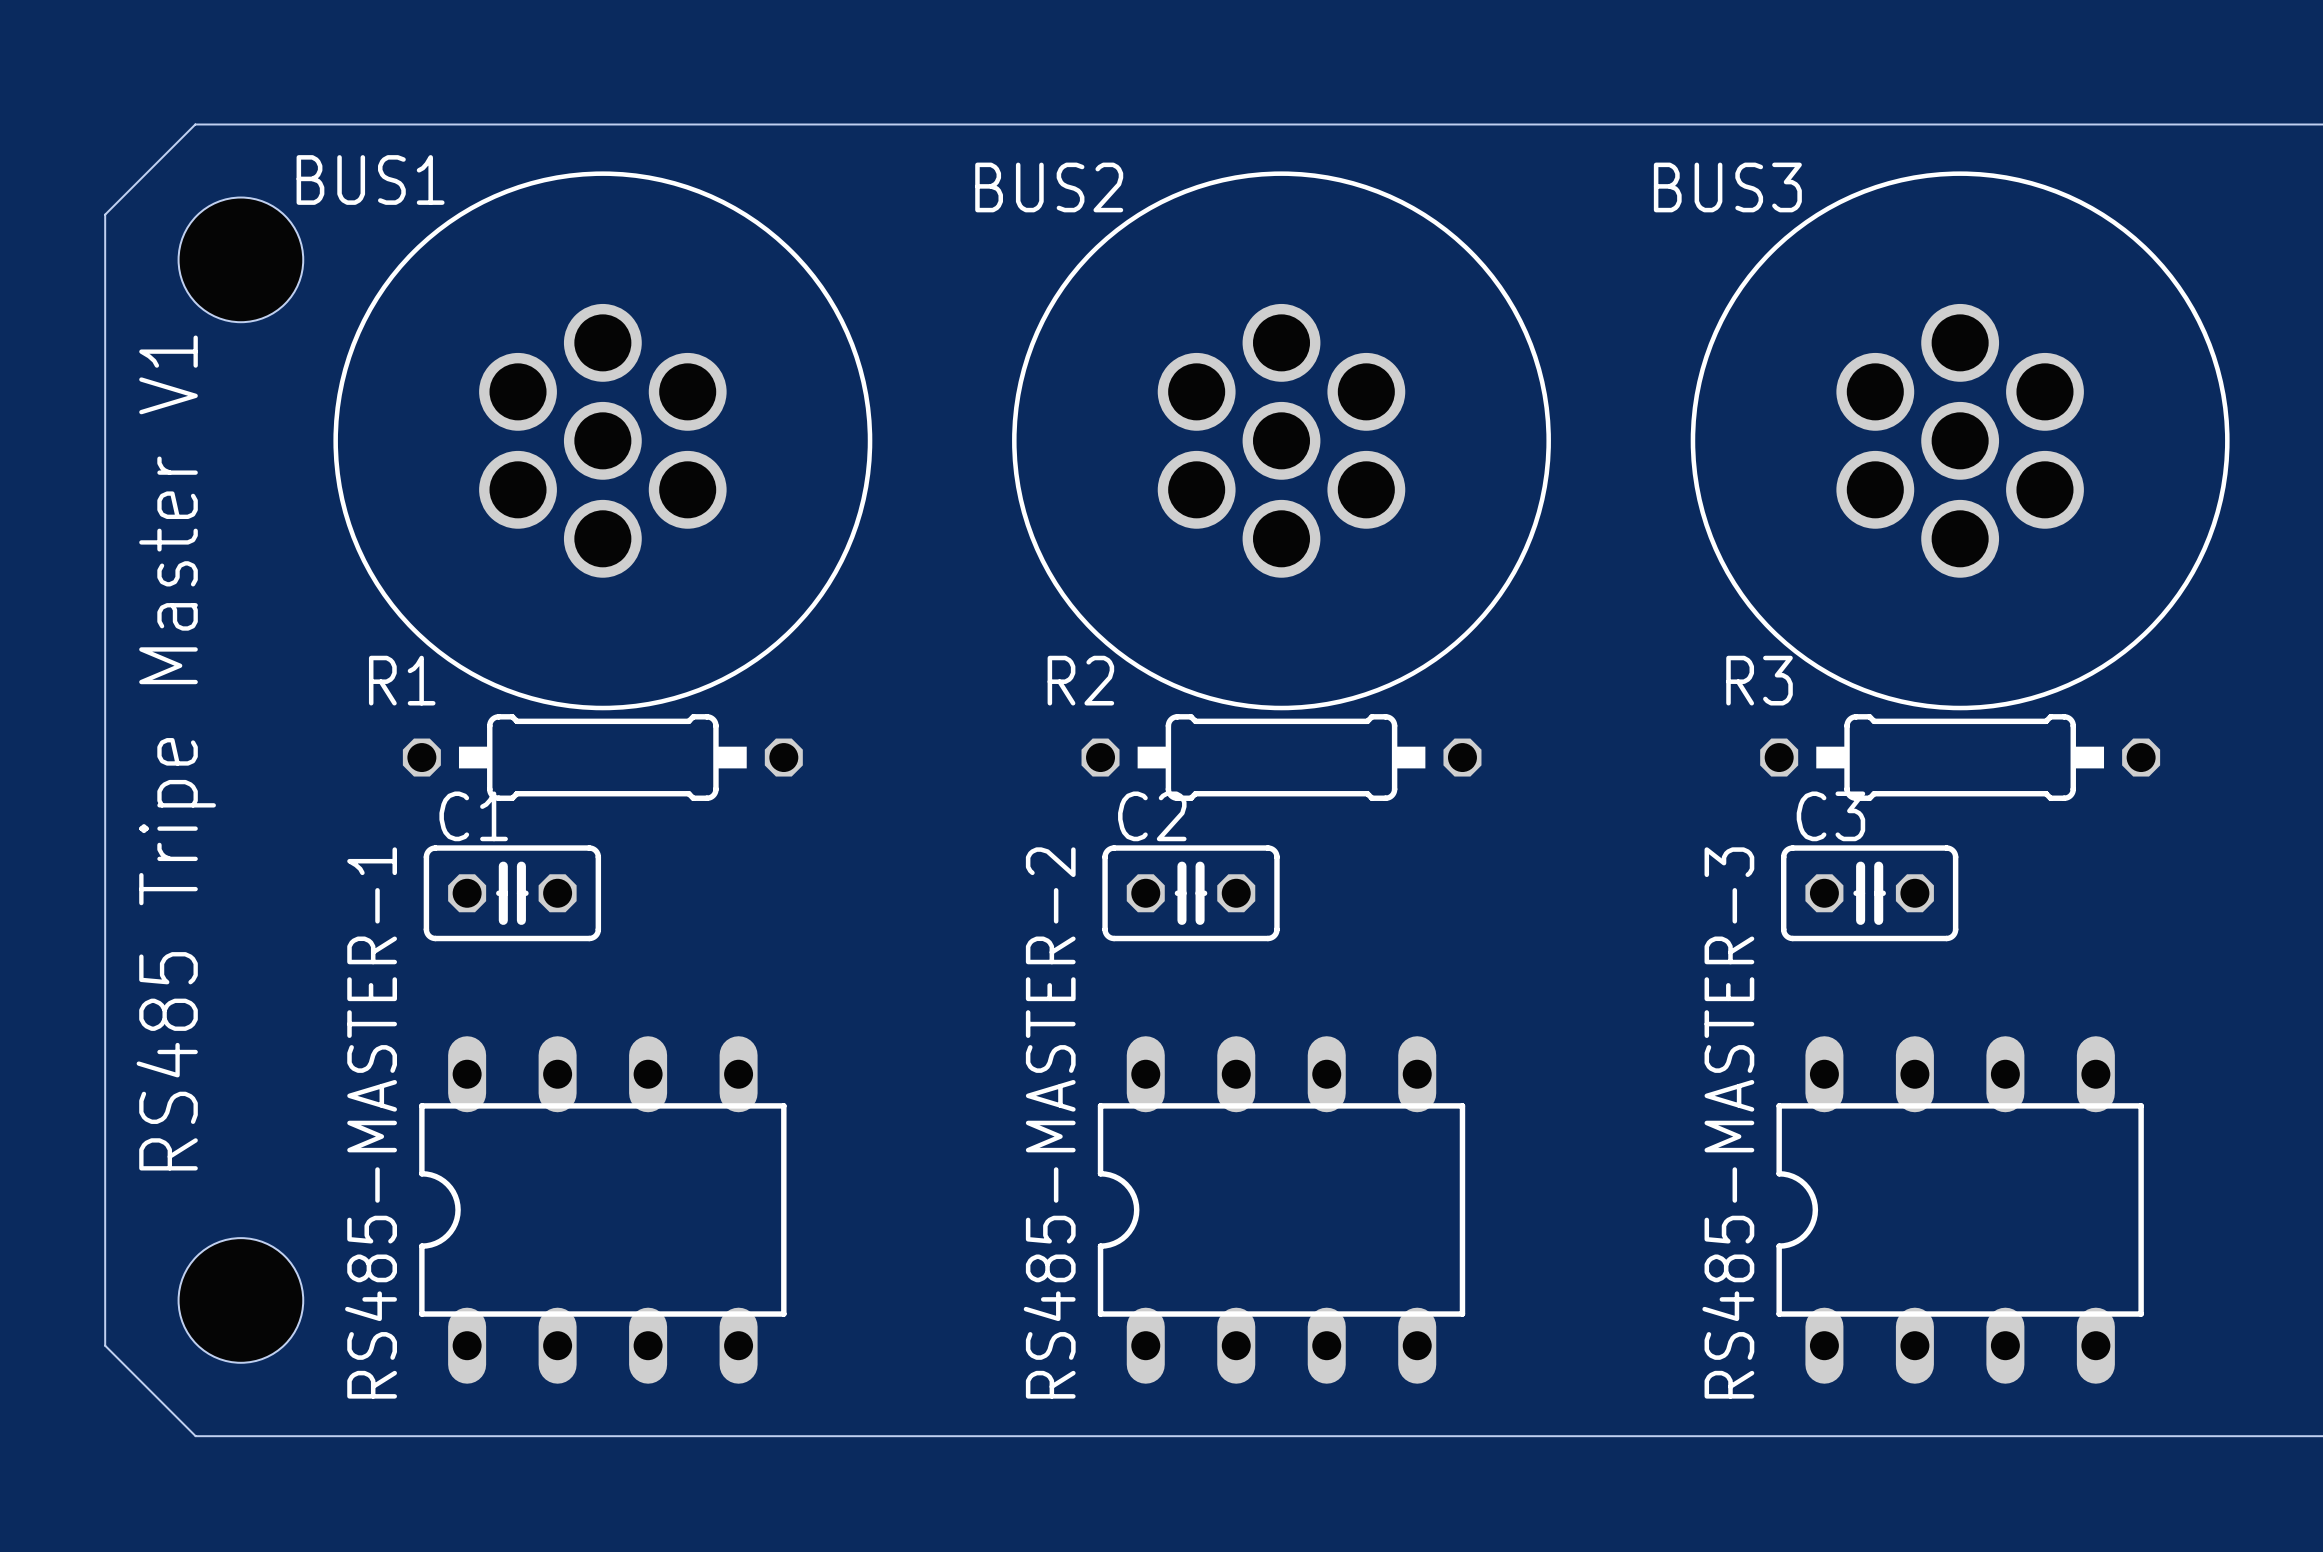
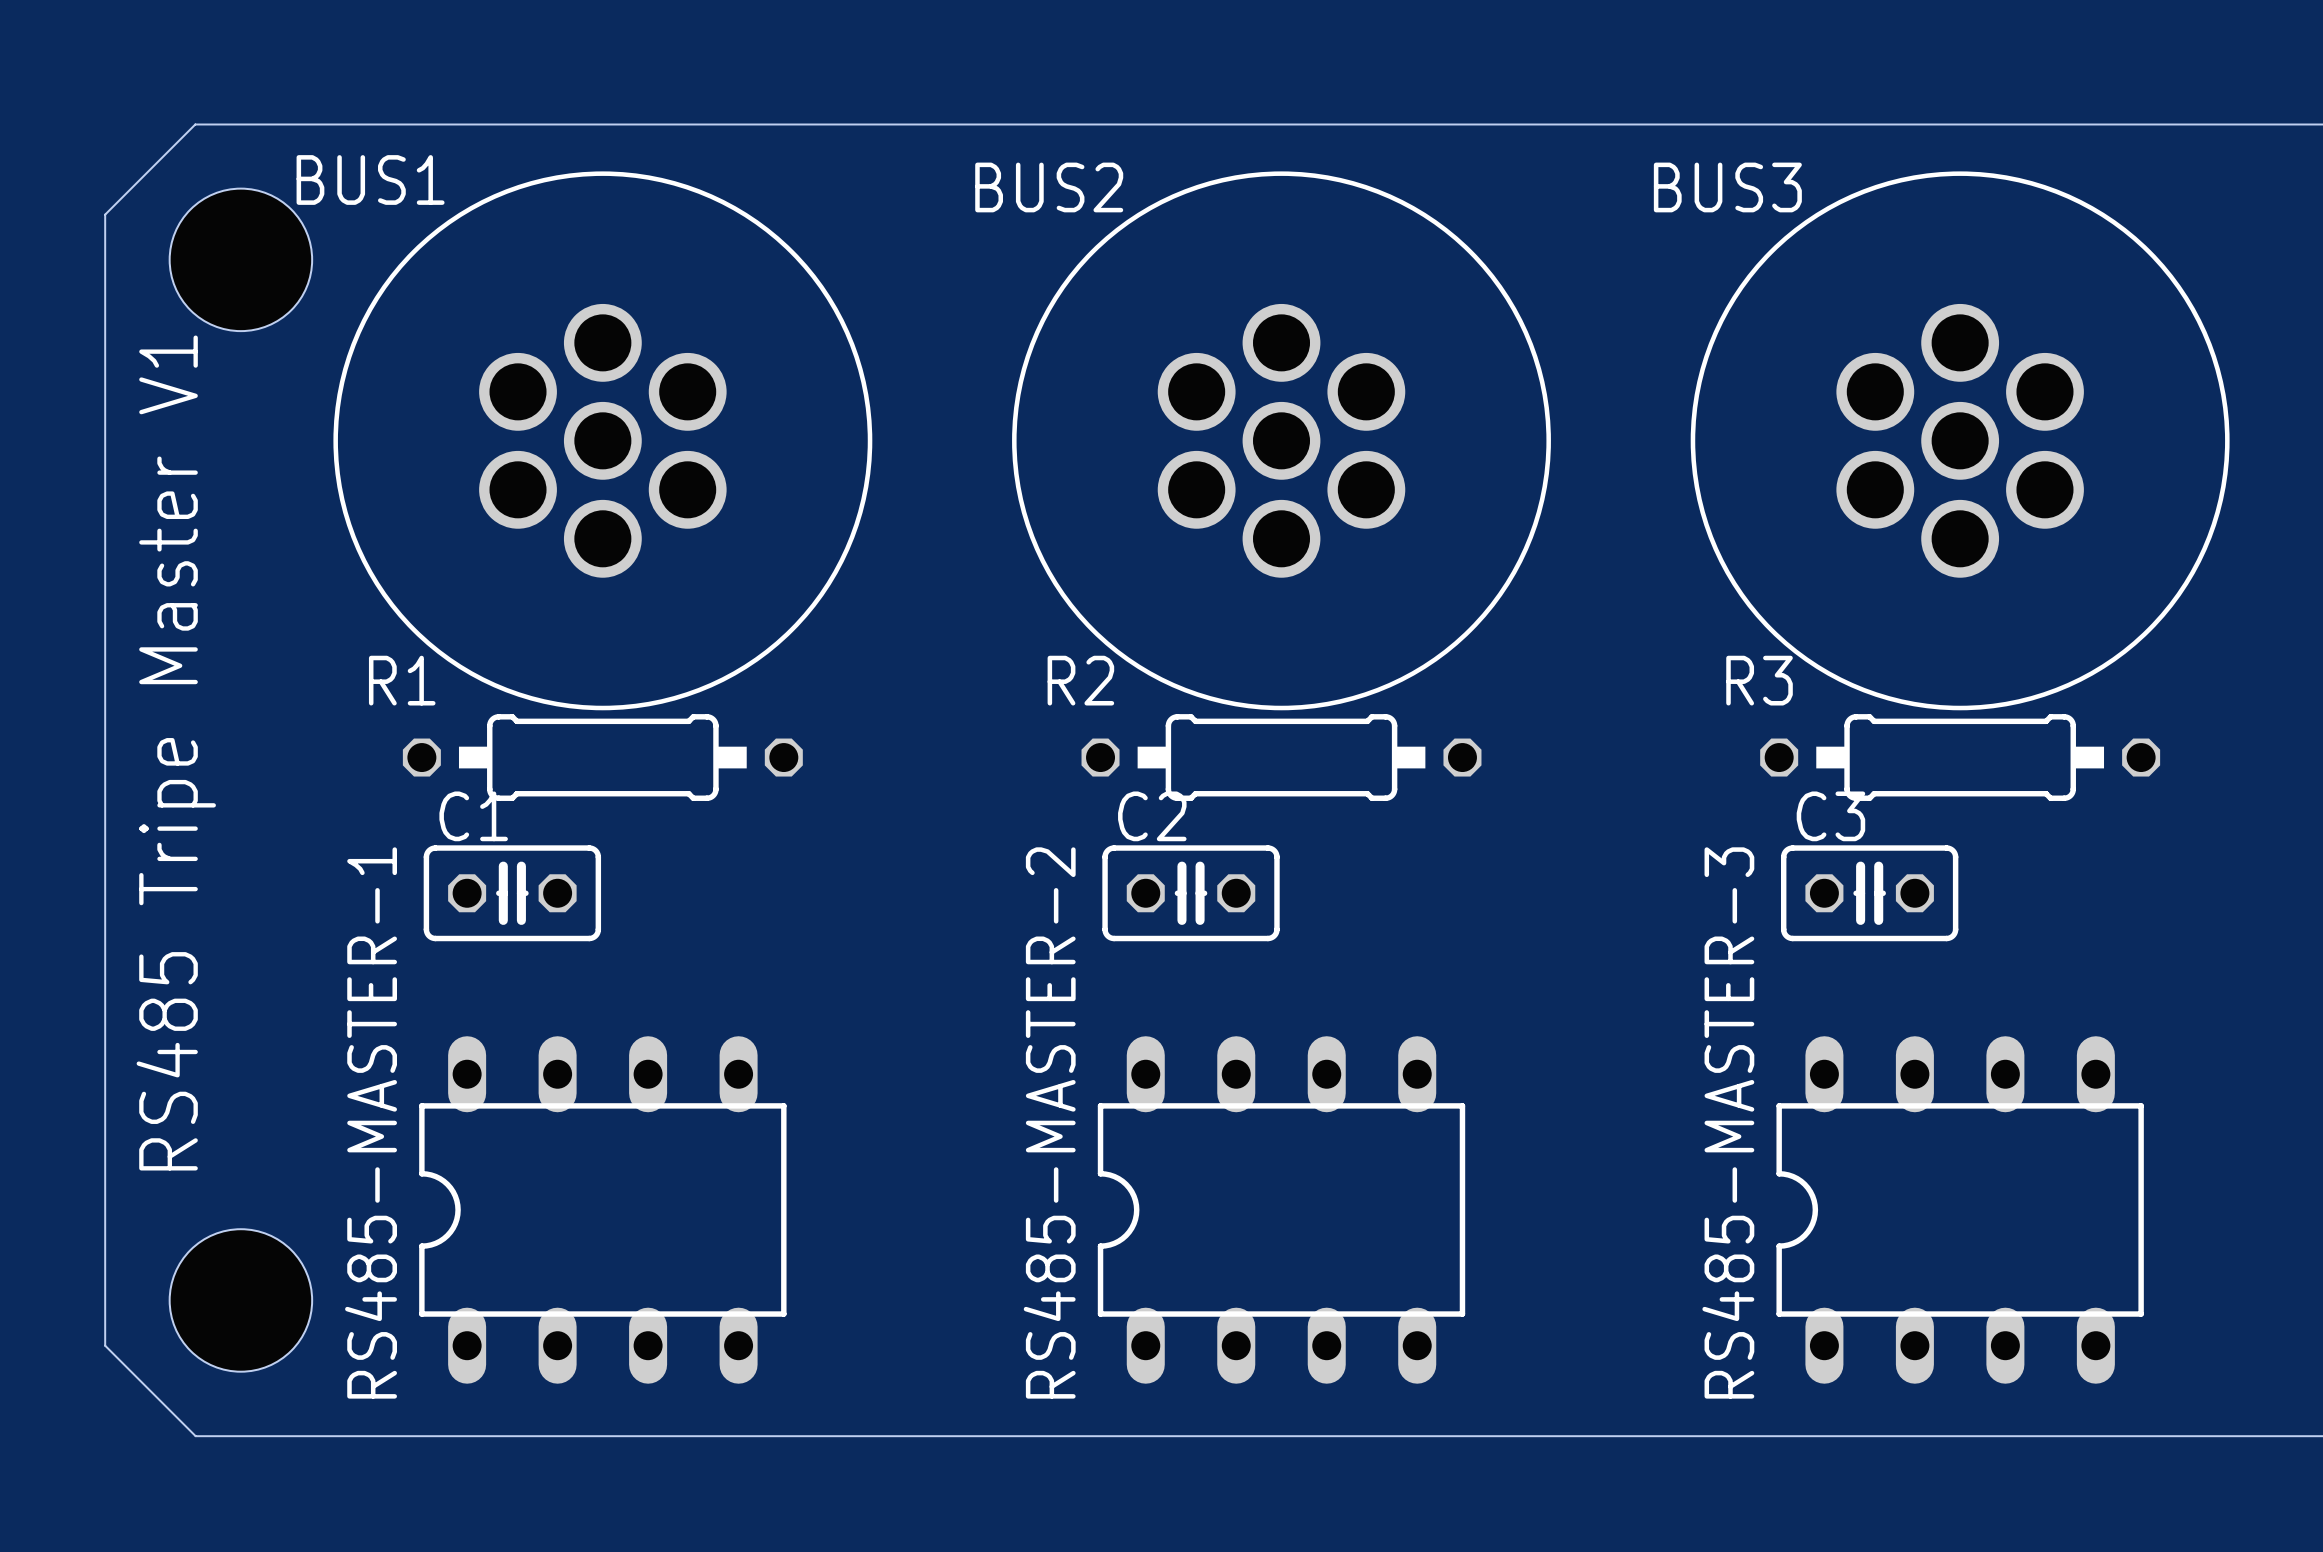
hole size: [178, 197, 304, 323] -> [169, 188, 313, 332]
hole size: [178, 1238, 304, 1363] -> [169, 1229, 313, 1372]

